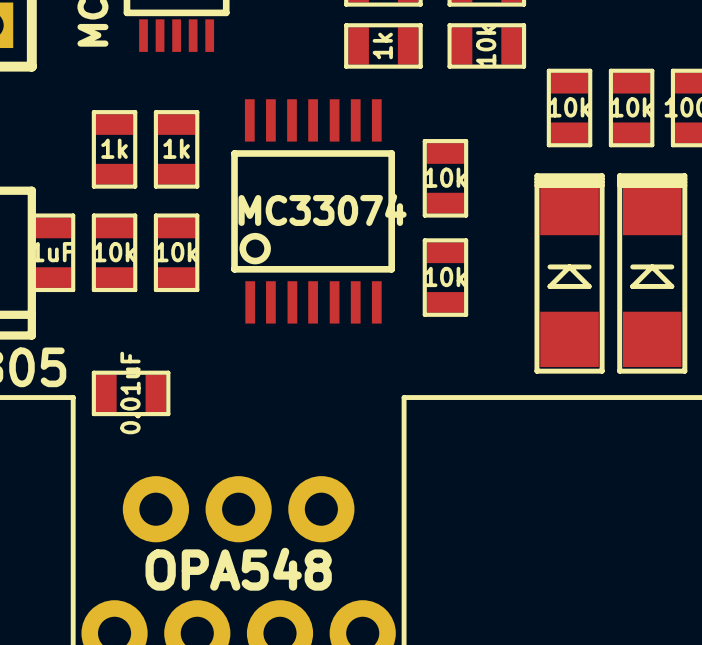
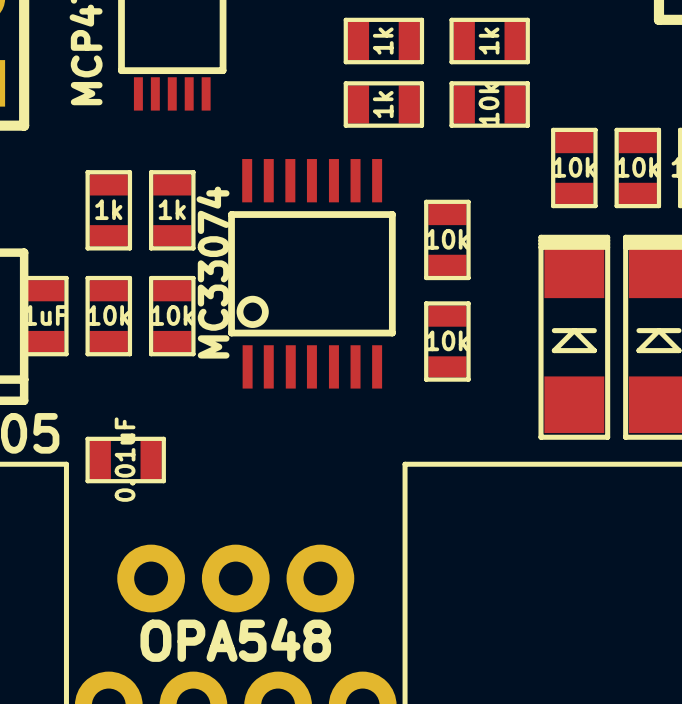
part value rotation: 0° (322, 209) -> 90° counterclockwise (213, 272)

